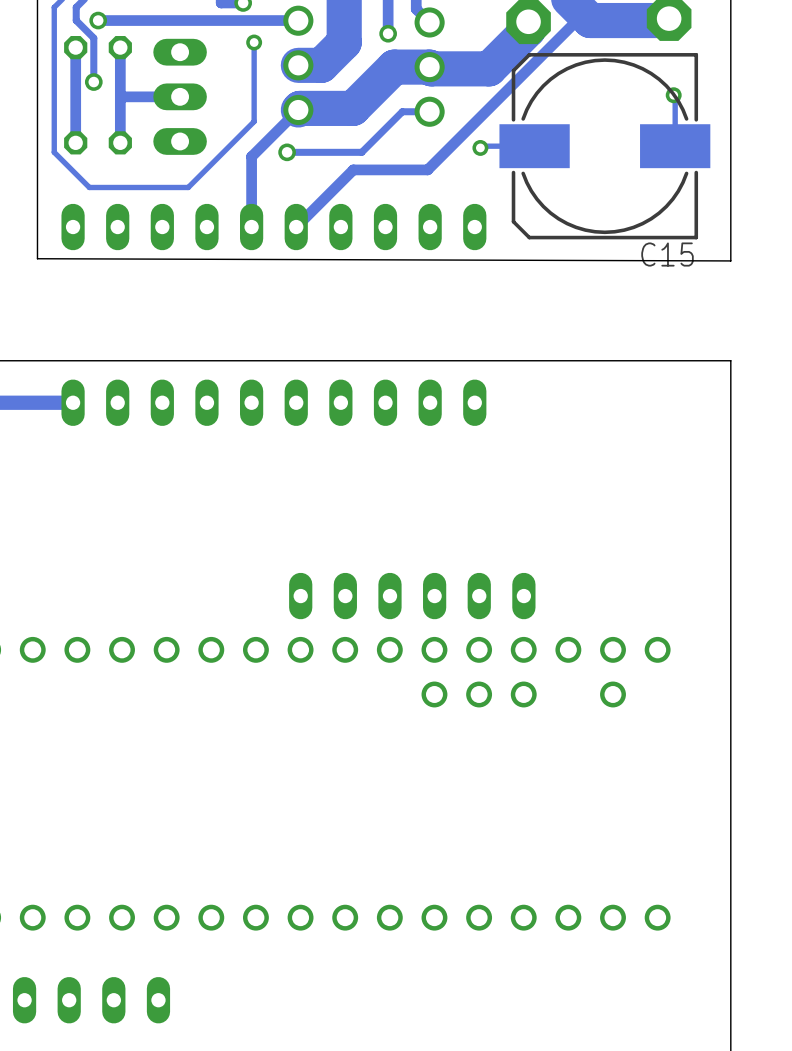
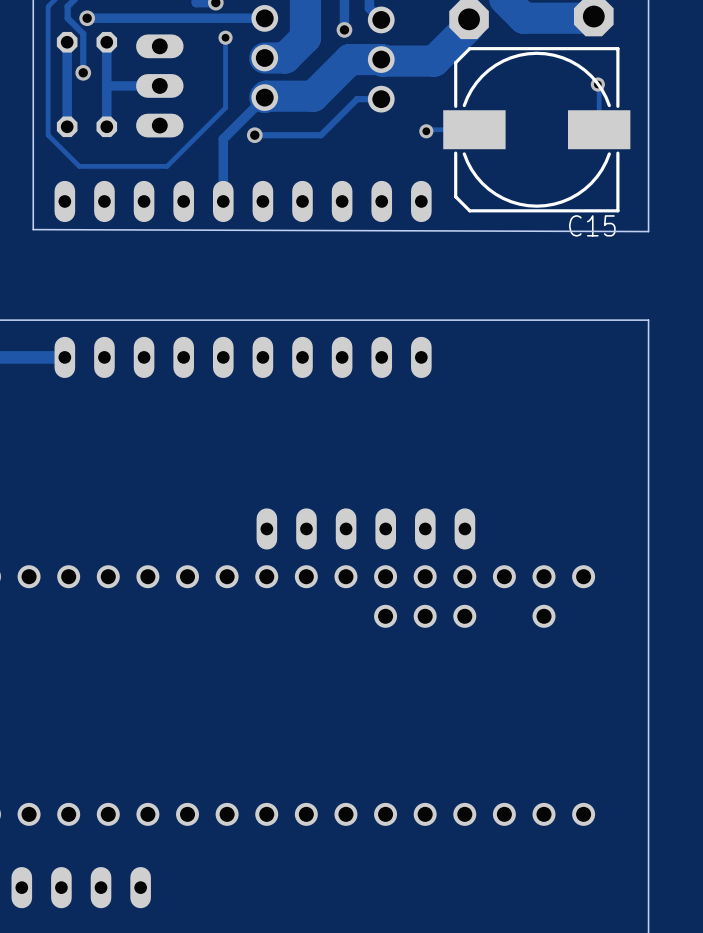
track: (590, 20) (577, 20) (427, 169) (353, 169) (296, 227) -> none

